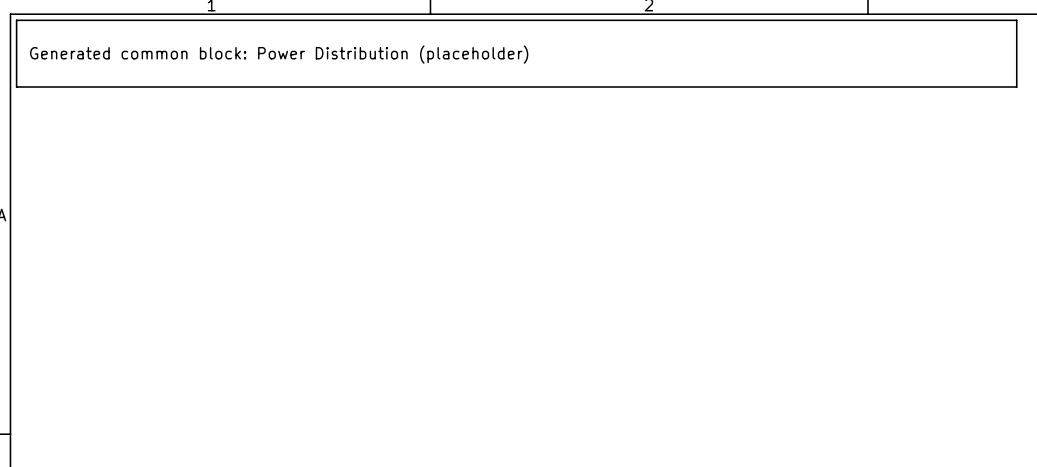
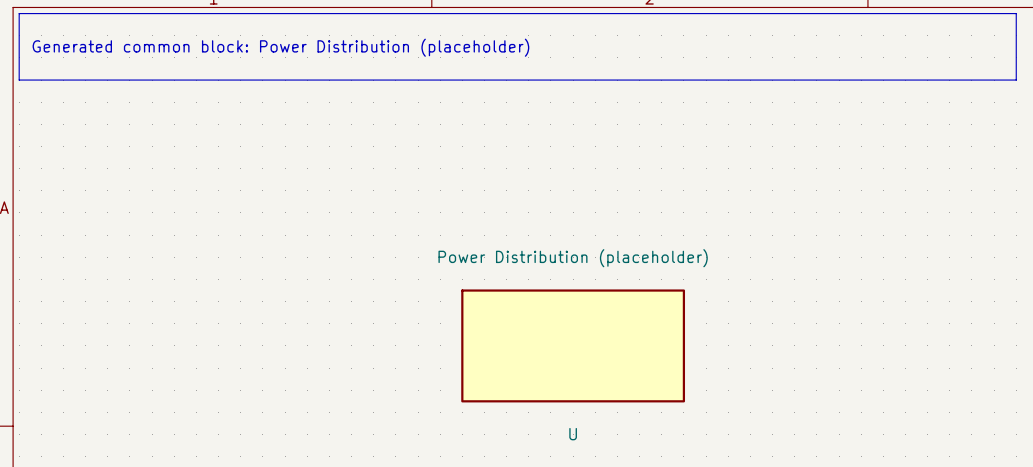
U: none -> Power Distribution (placeholder) (573, 345)

